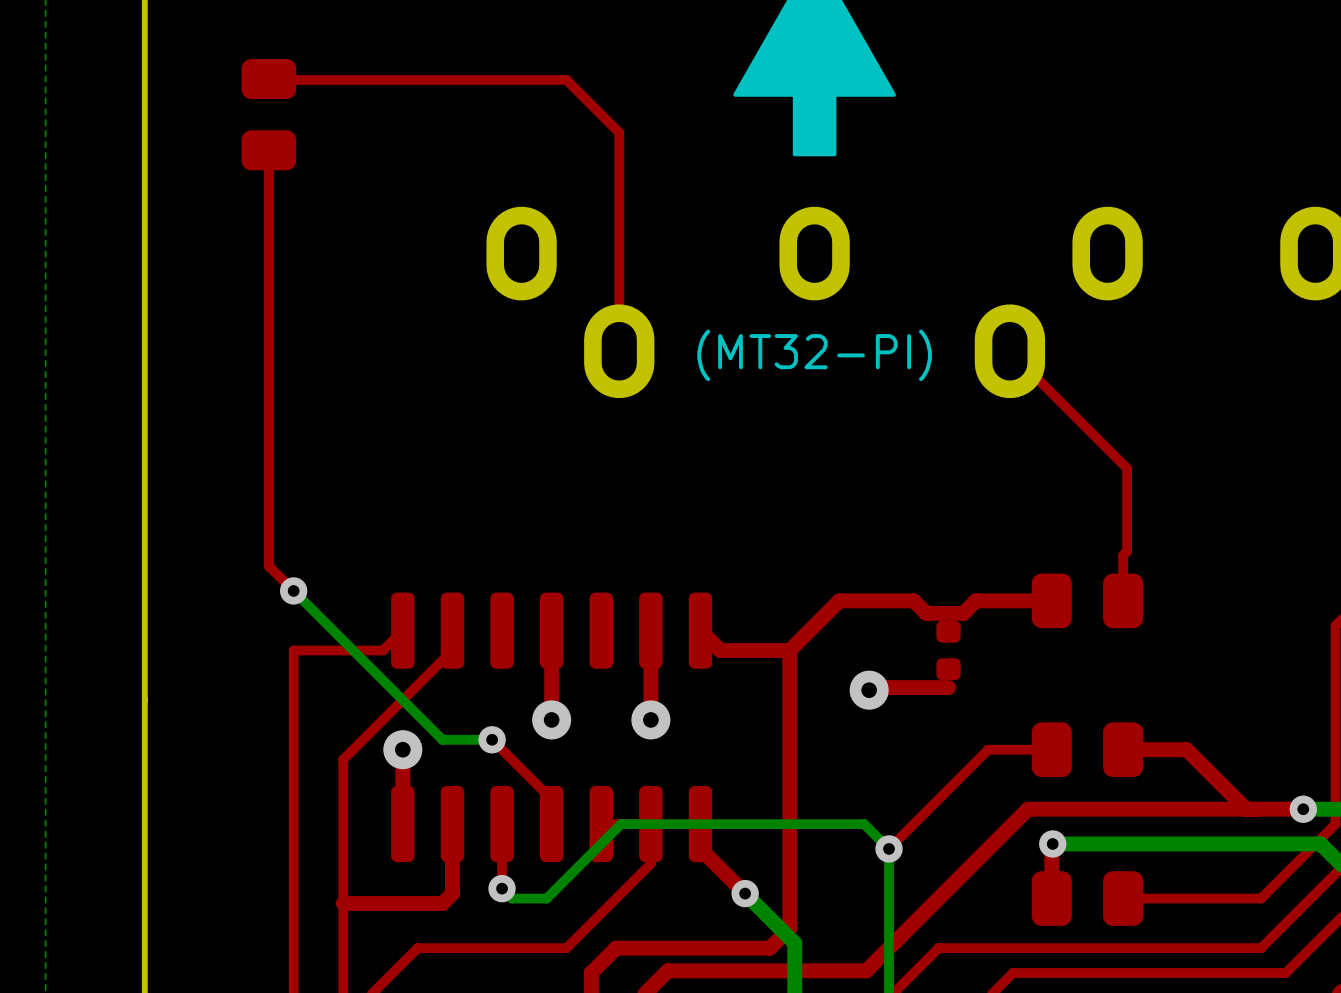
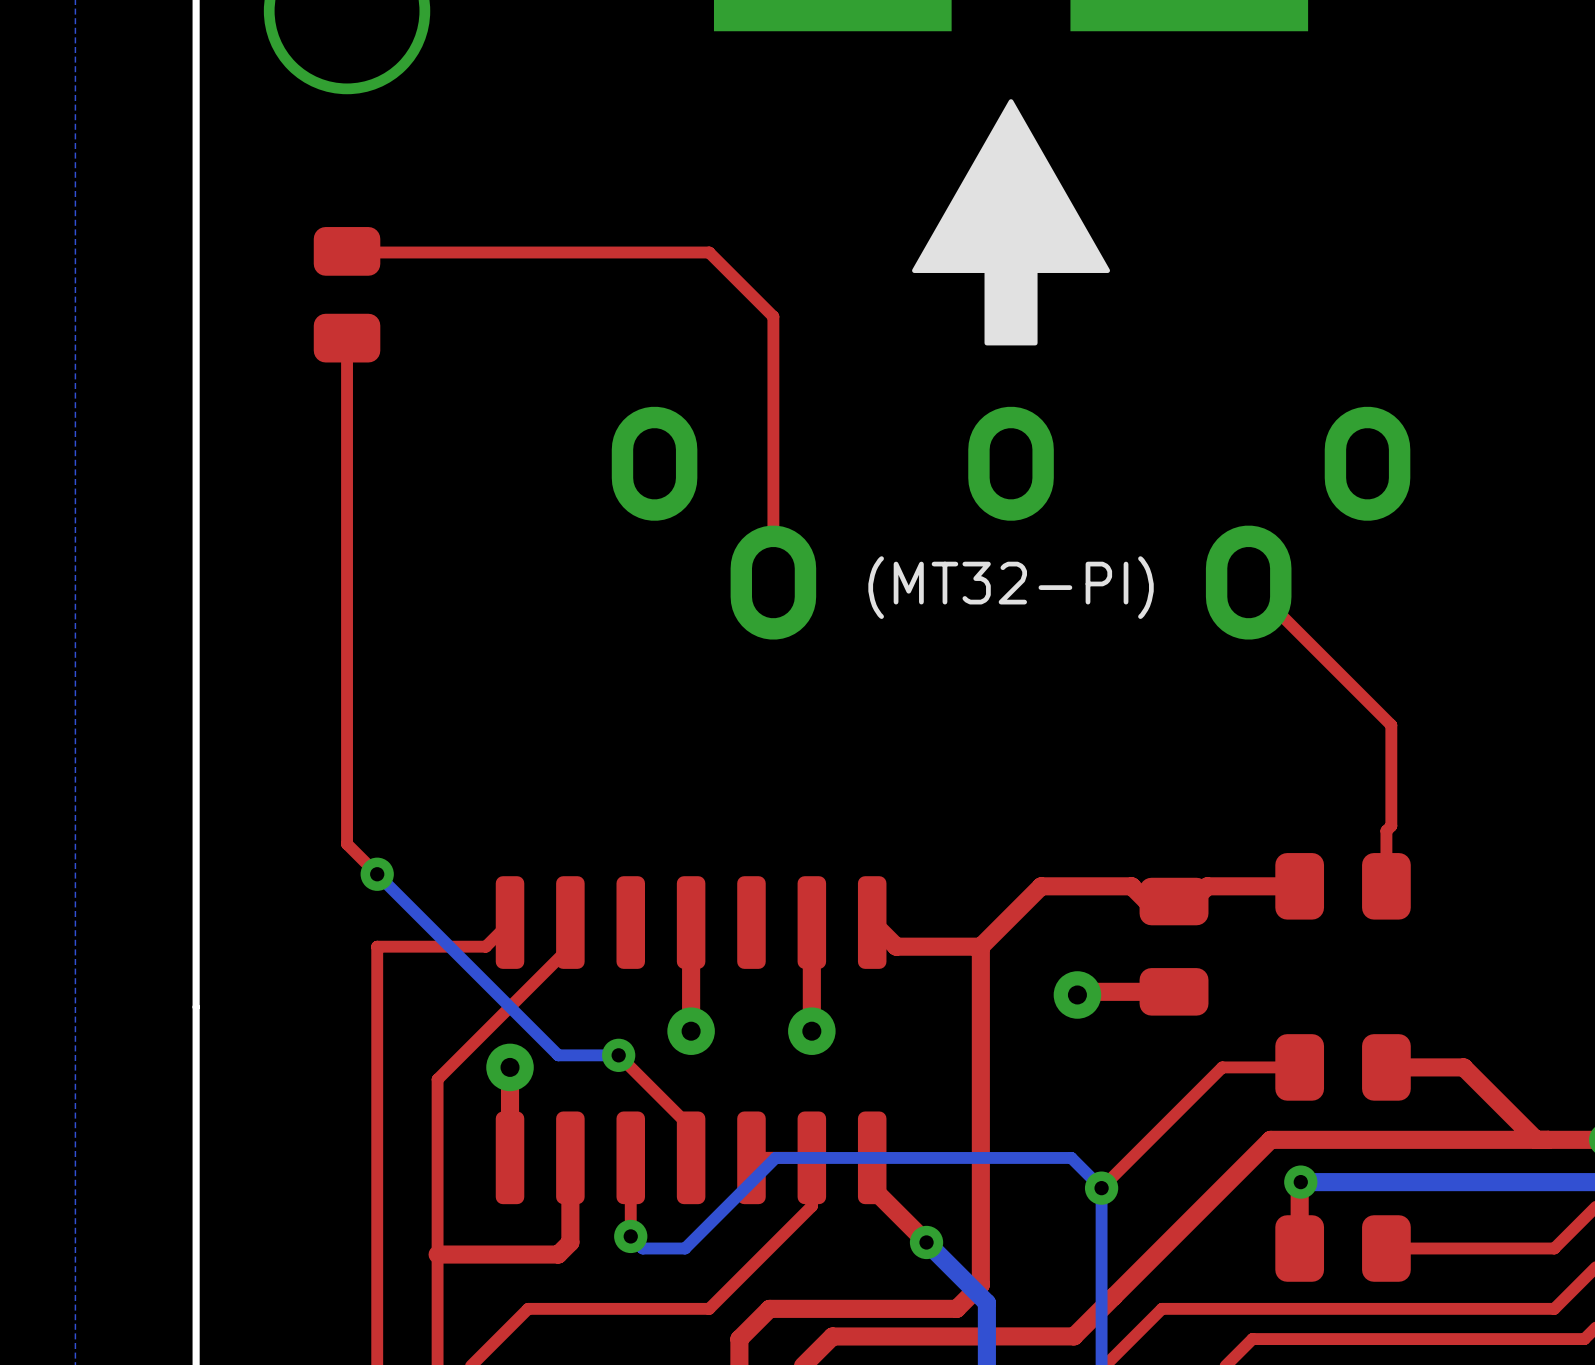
part footprint: [936, 620, 961, 681] -> [1139, 877, 1209, 1016]

